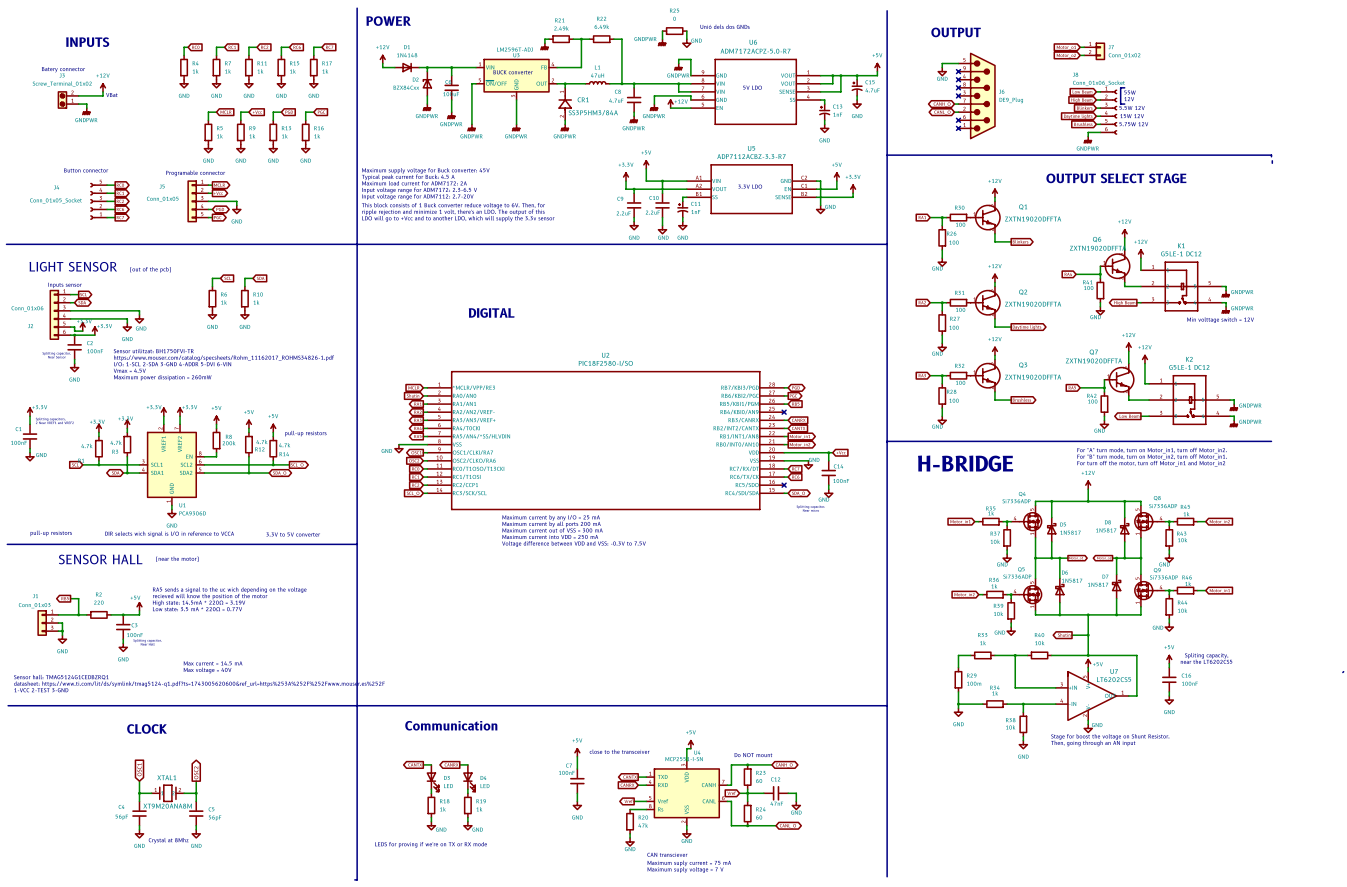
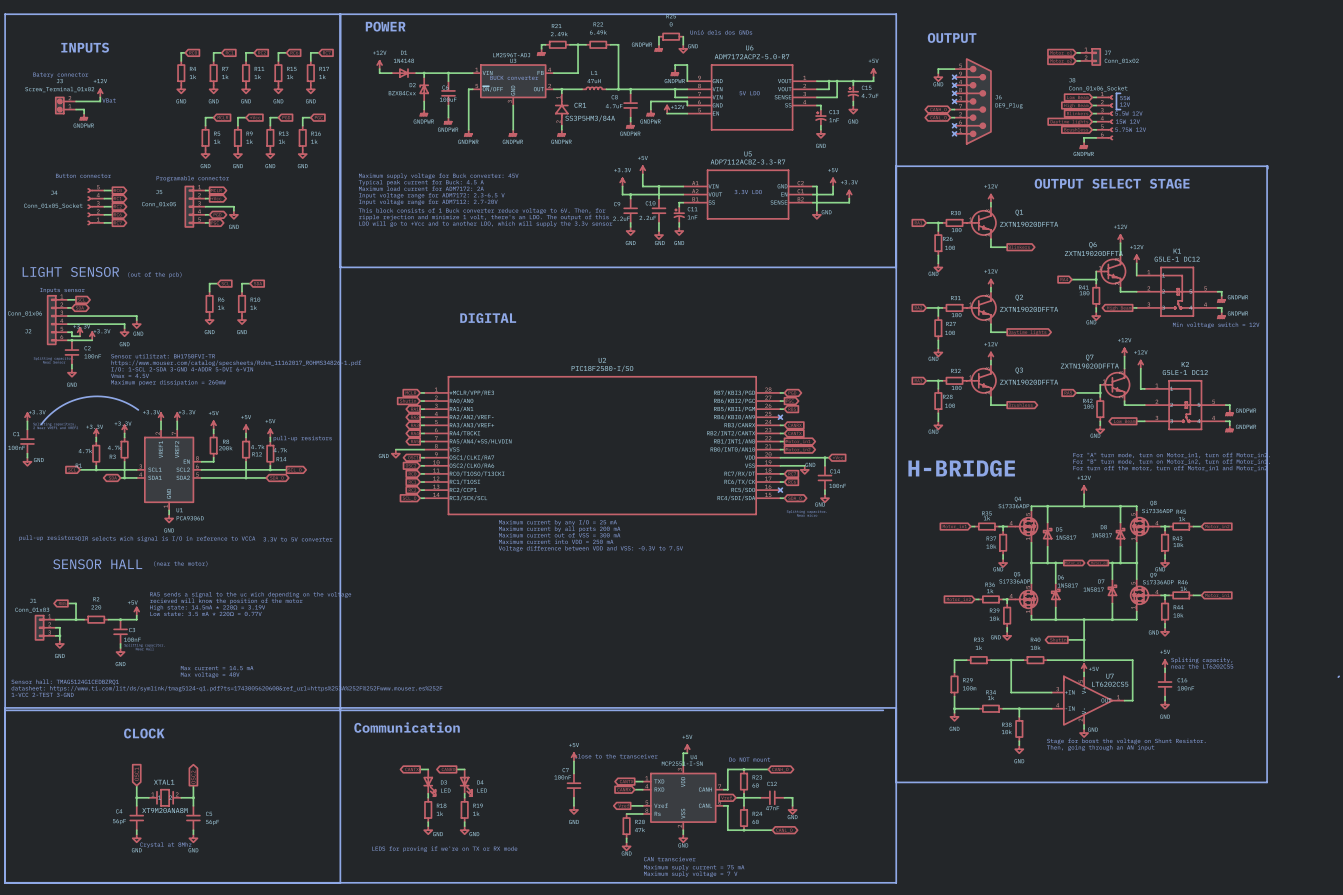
line: (357, 8) (357, 879) (354, 879) -> none
line: (887, 10) (887, 876) -> none
line: (887, 155) (1271, 155) (1271, 156) -> none
line: none -> (896, 166) (1267, 166) (1267, 782) (896, 782)
line: (6, 244) (887, 244) -> none
line: none -> (896, 267) (340, 267) (340, 14) (896, 14) (896, 882) (5, 882) (5, 707) (896, 707)
line: none -> (138, 409) (125, 402) (112, 397) (86, 397) (72, 400) (59, 407) (41, 424)
line: (887, 441) (1271, 441) -> none
line: (7, 544) (356, 544) -> none
text position: Communication (451, 725) -> Communication (407, 727)
line: none -> (5, 882) (5, 14) (340, 14) (340, 882)

